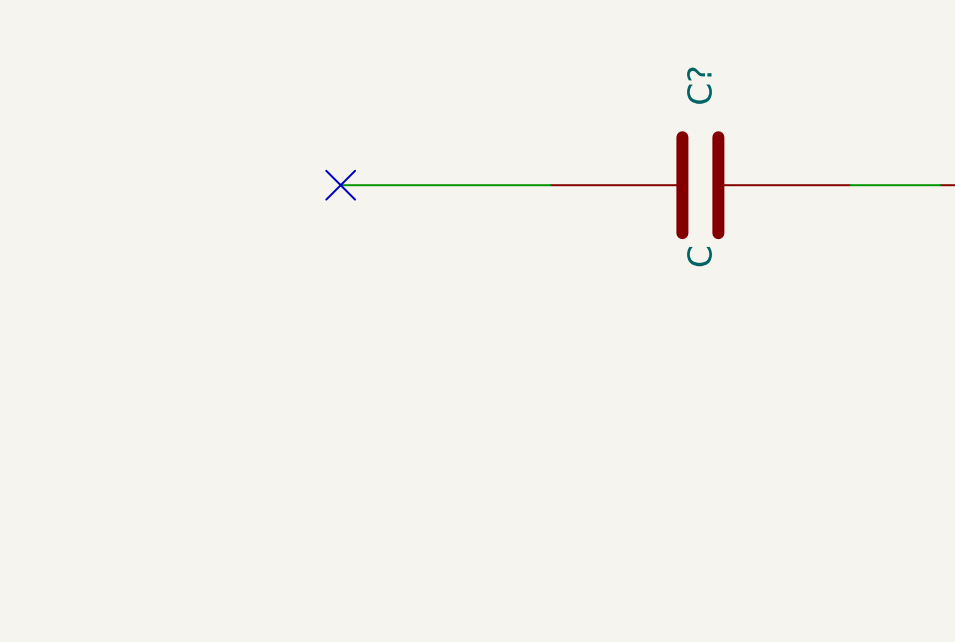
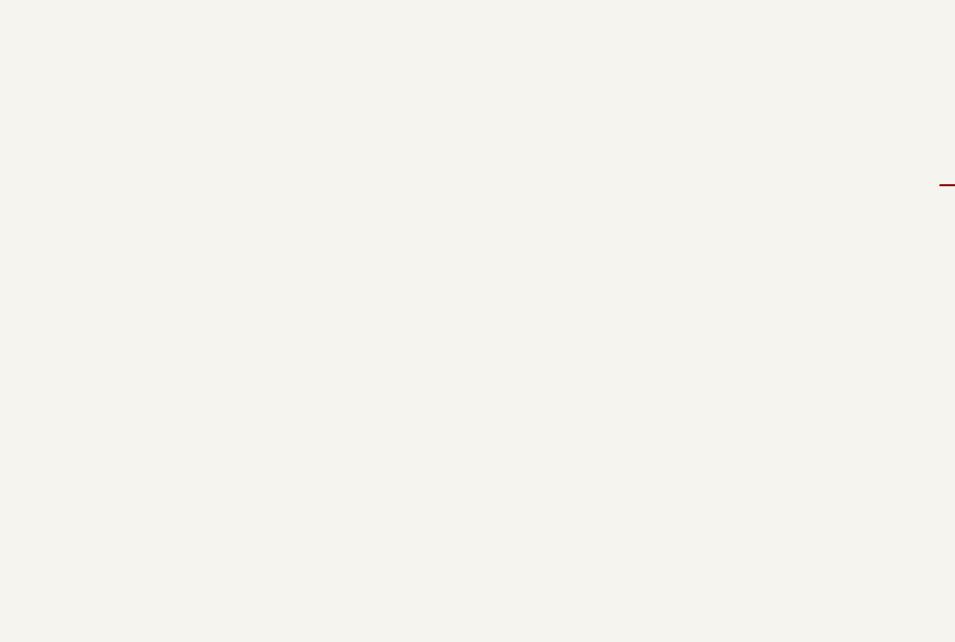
wire: (340, 185) (550, 185) -> none
no-connect mark: (340, 185) -> none
C?: C (700, 185) -> none
wire: (850, 185) (940, 185) -> none

